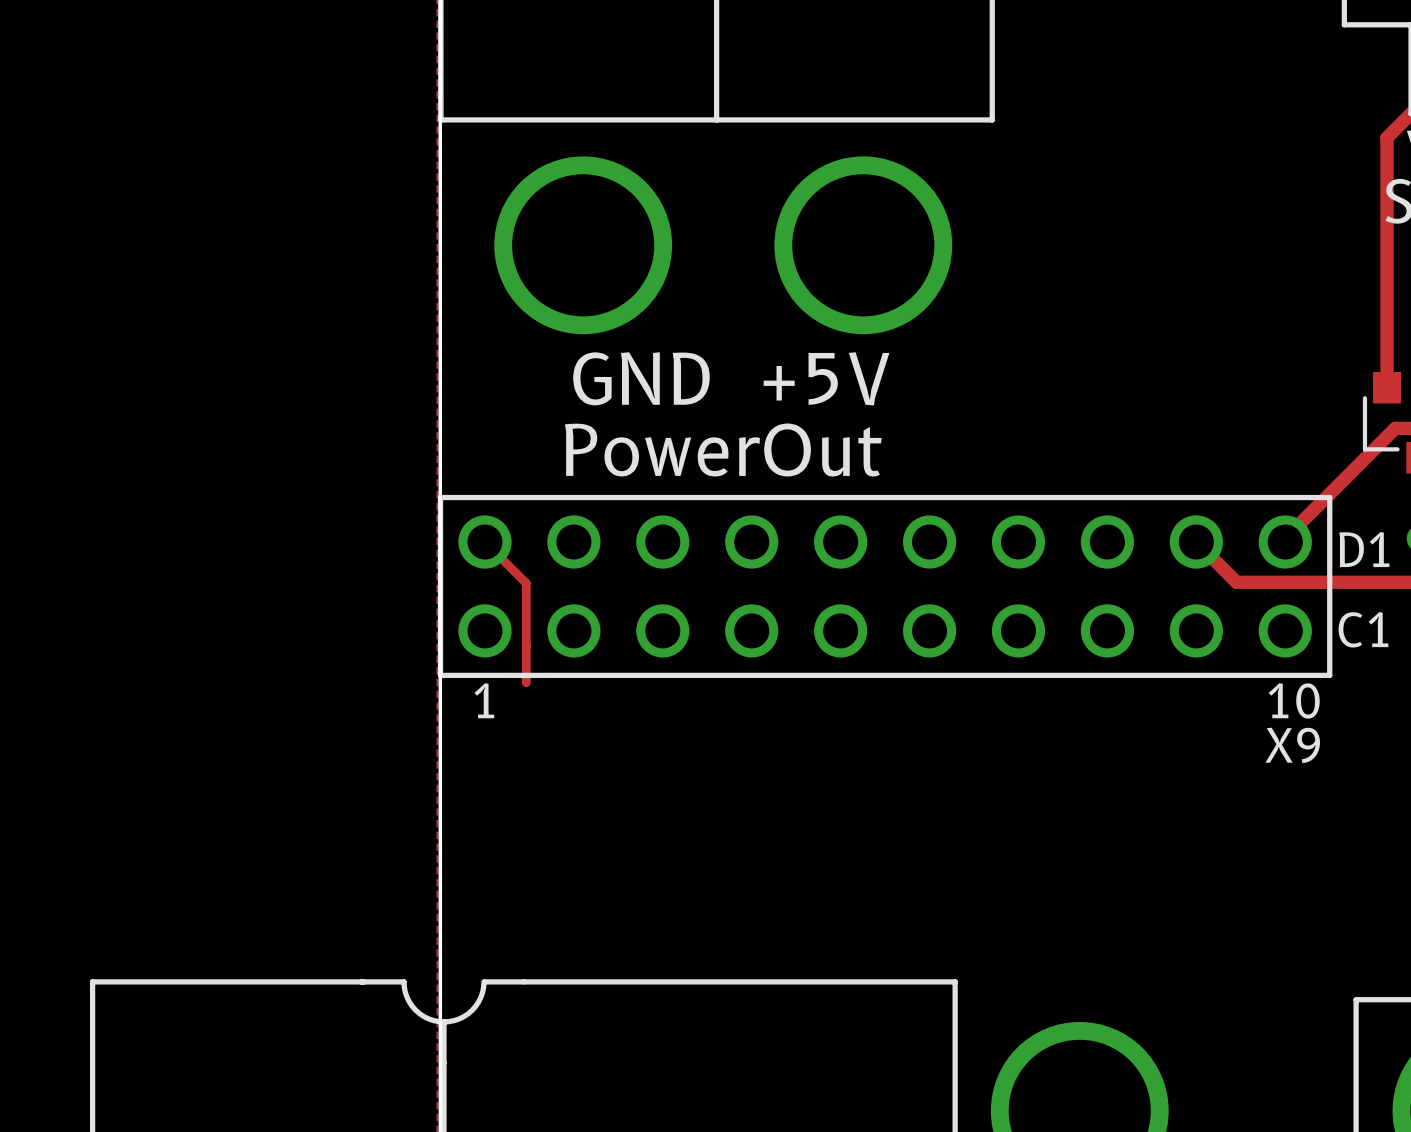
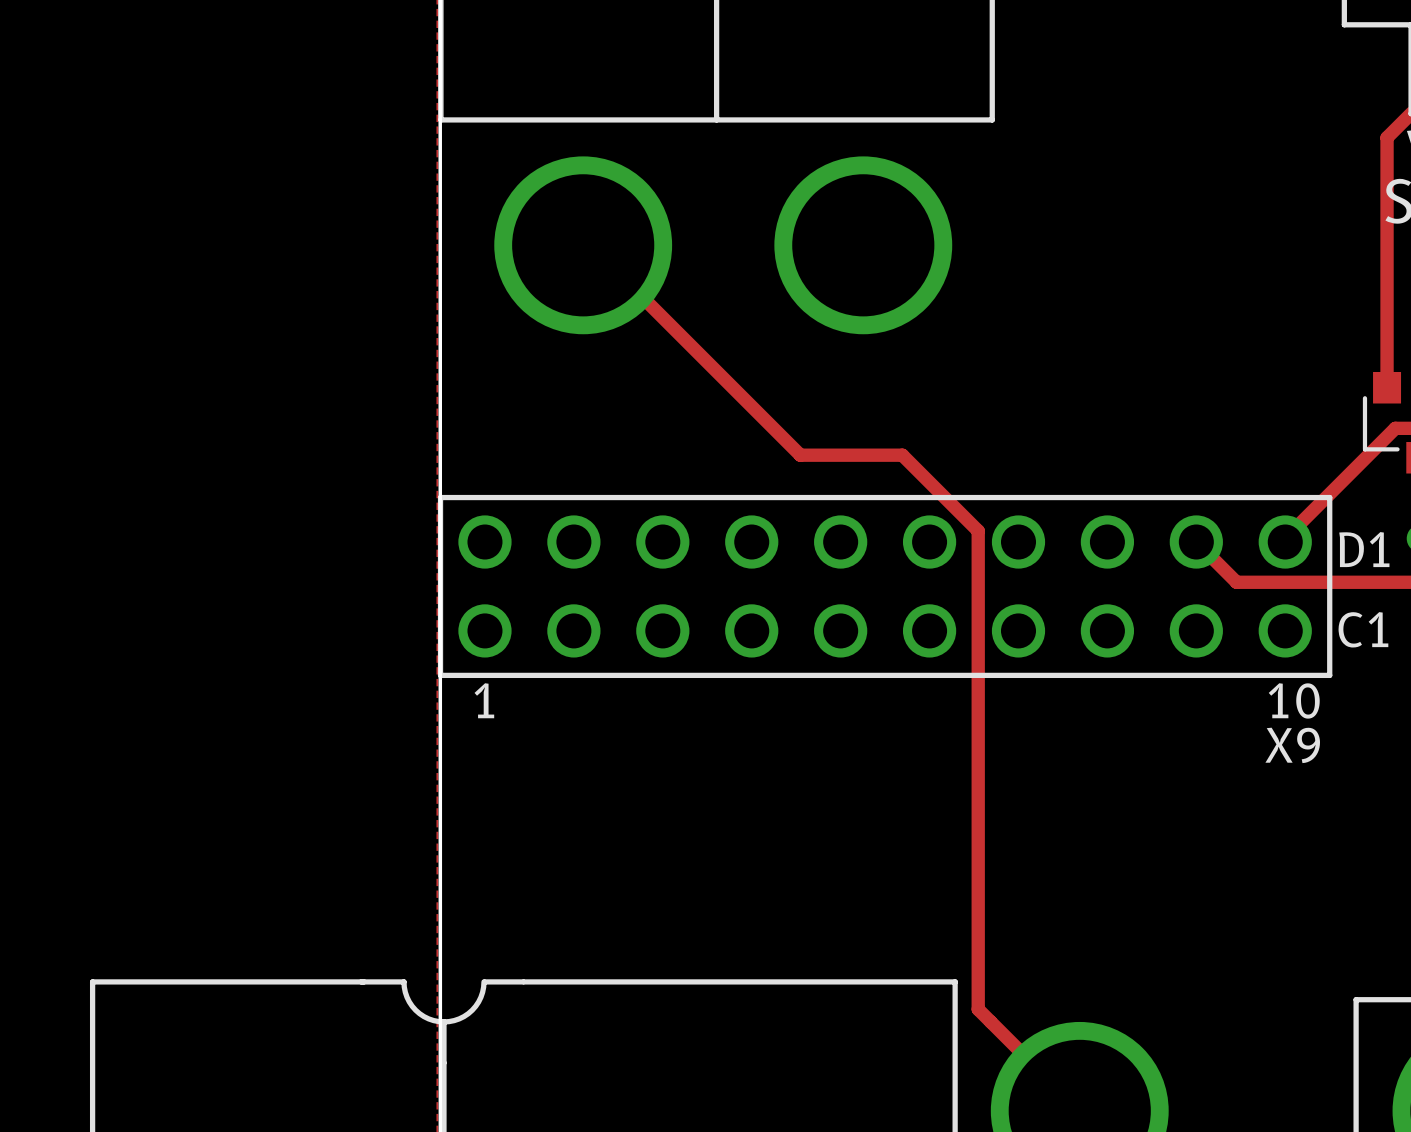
track: none -> (589, 244) (800, 455) (902, 455) (978, 531) (978, 1009) (1079, 1110)
text: GND +5V (731, 378) -> none
text: PowerOut (723, 449) -> none
track: (484, 542) (526, 583) (526, 682) -> none

